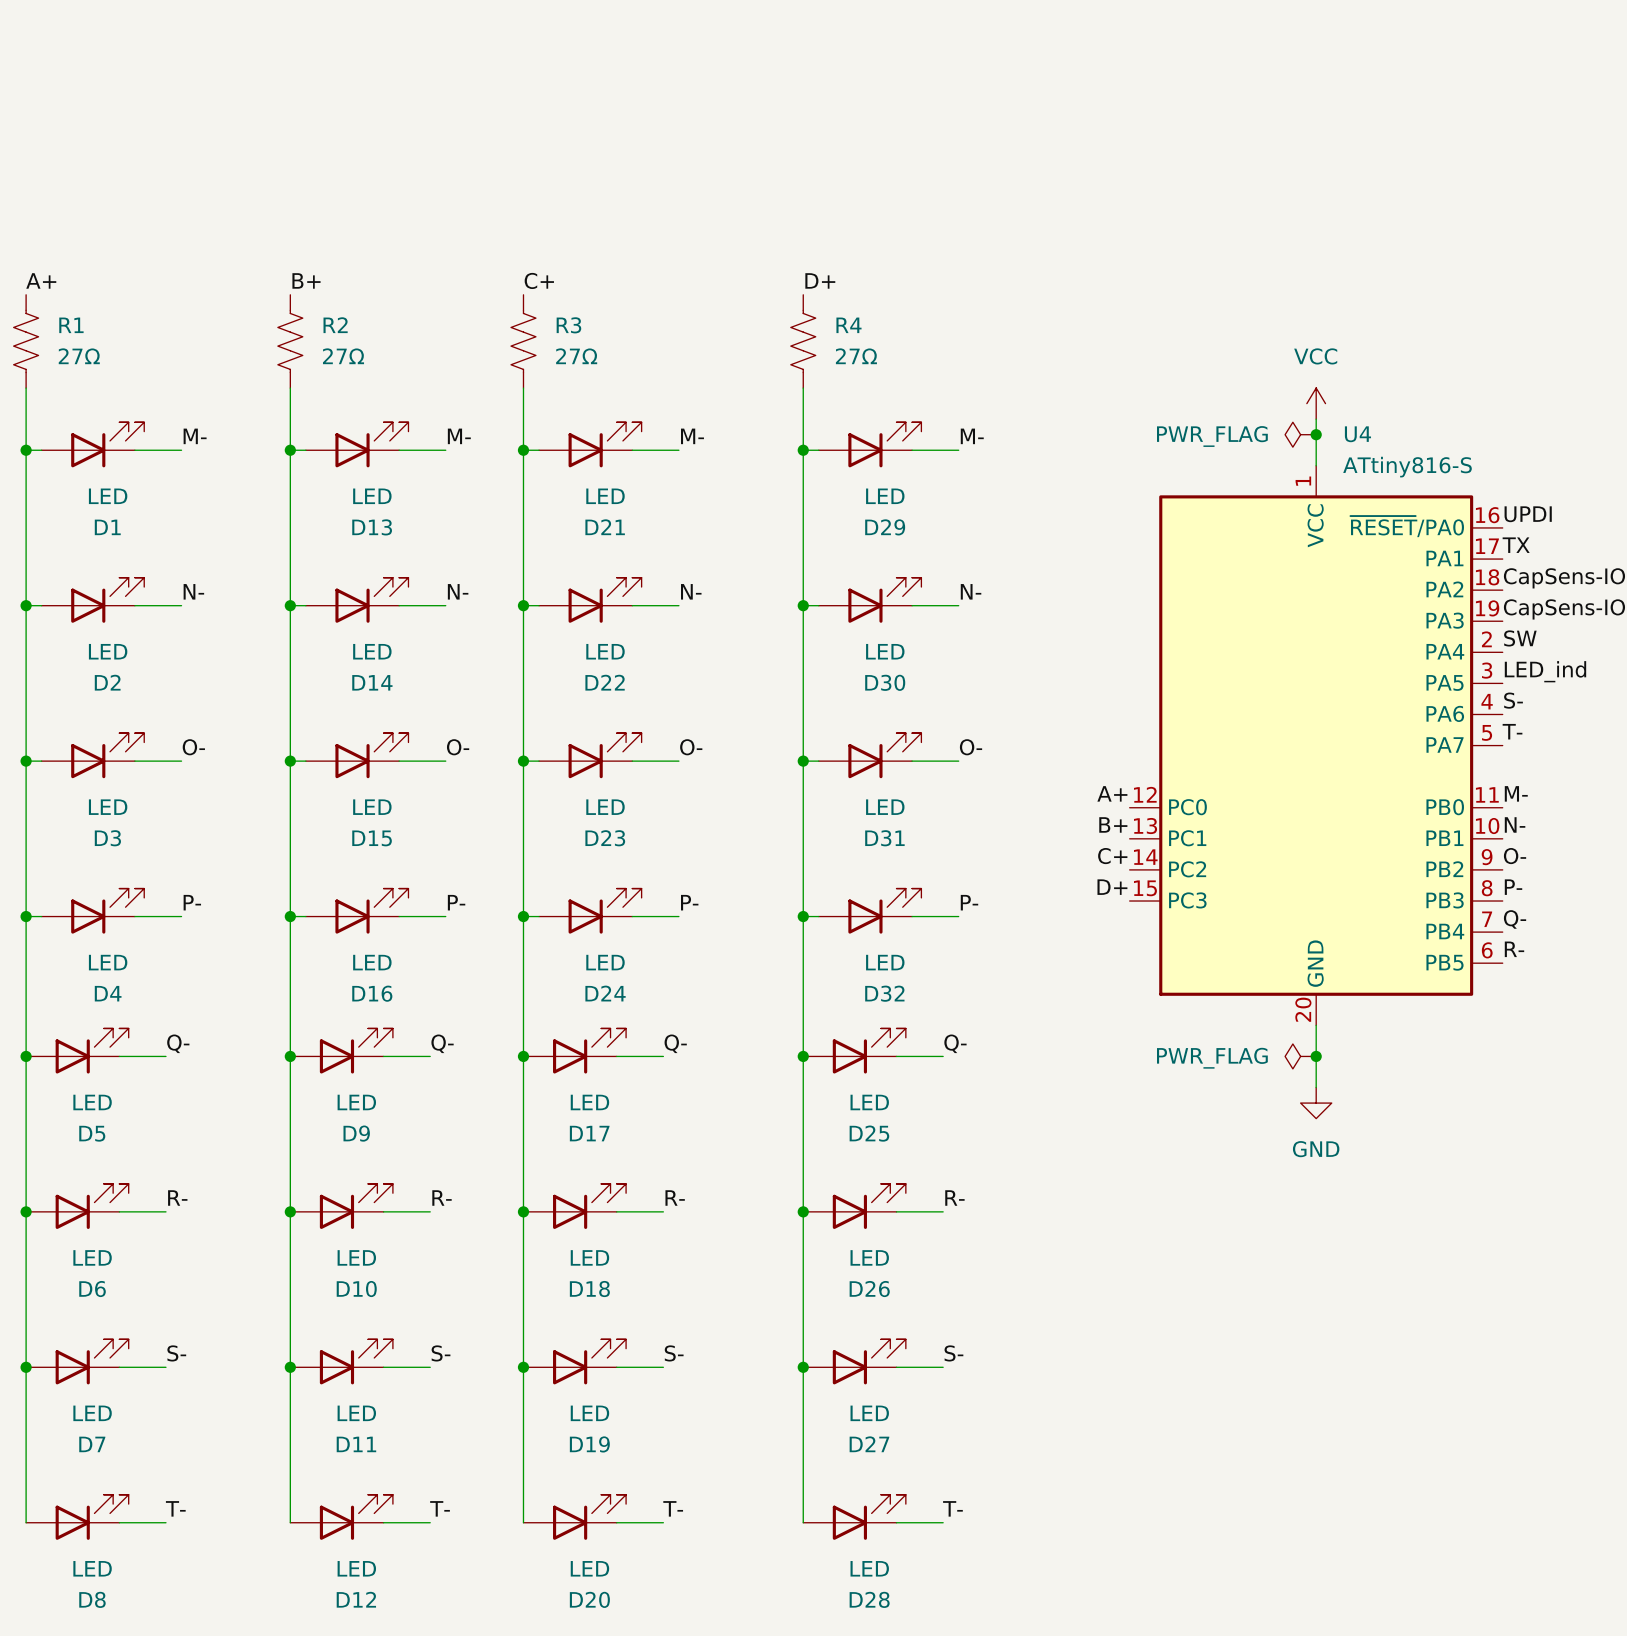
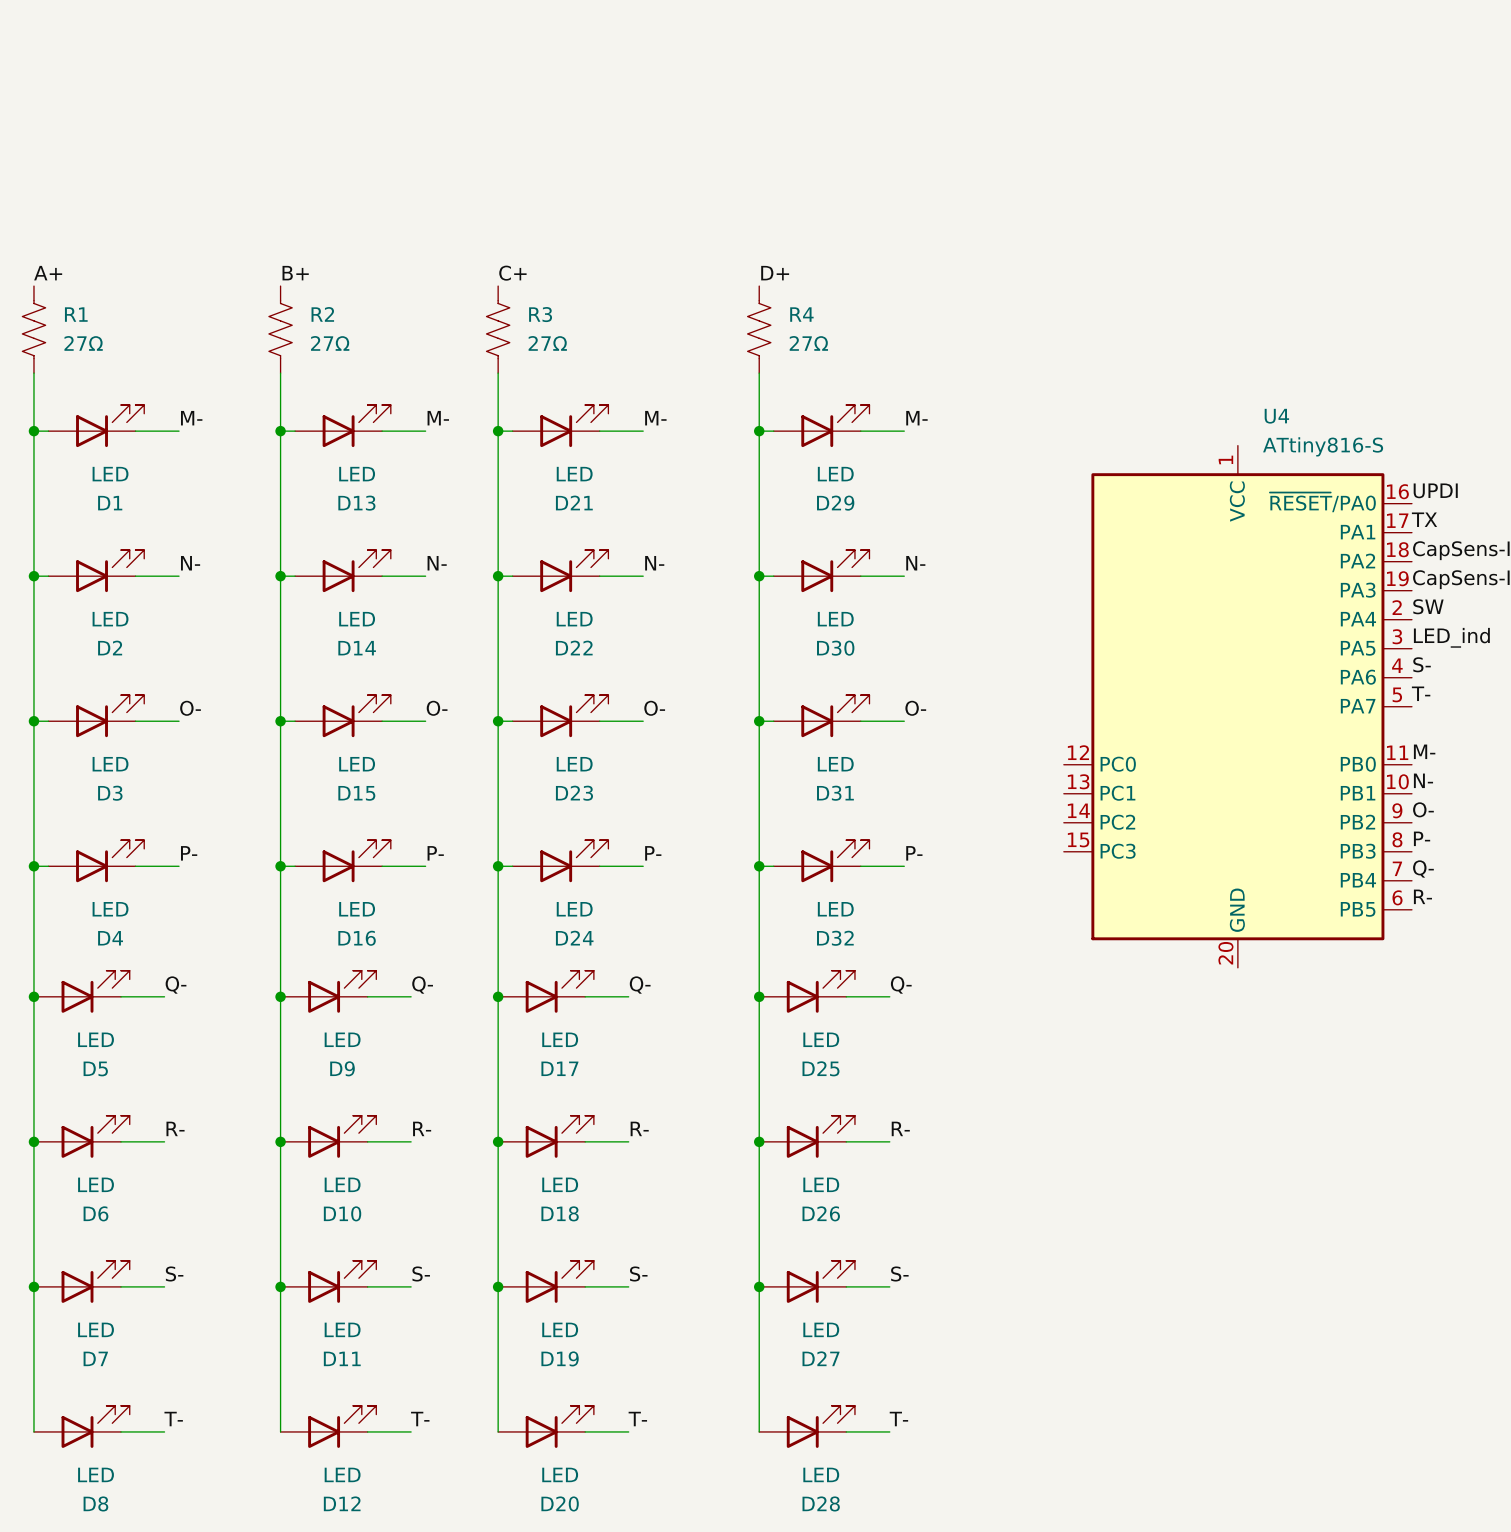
power symbol: VCC (1316, 403) -> none
wire: (1316, 419) (1316, 465) -> none
power symbol: PWR_FLAG (1300, 434) -> none
junction: (1316, 434) -> none
label: A+ (1112, 793) -> none
label: B+ (1113, 824) -> none
label: C+ (1112, 856) -> none
label: D+ (1112, 887) -> none
wire: (1316, 1025) (1316, 1087) -> none
power symbol: PWR_FLAG (1300, 1056) -> none
junction: (1316, 1056) -> none
power symbol: GND (1316, 1103) -> none

